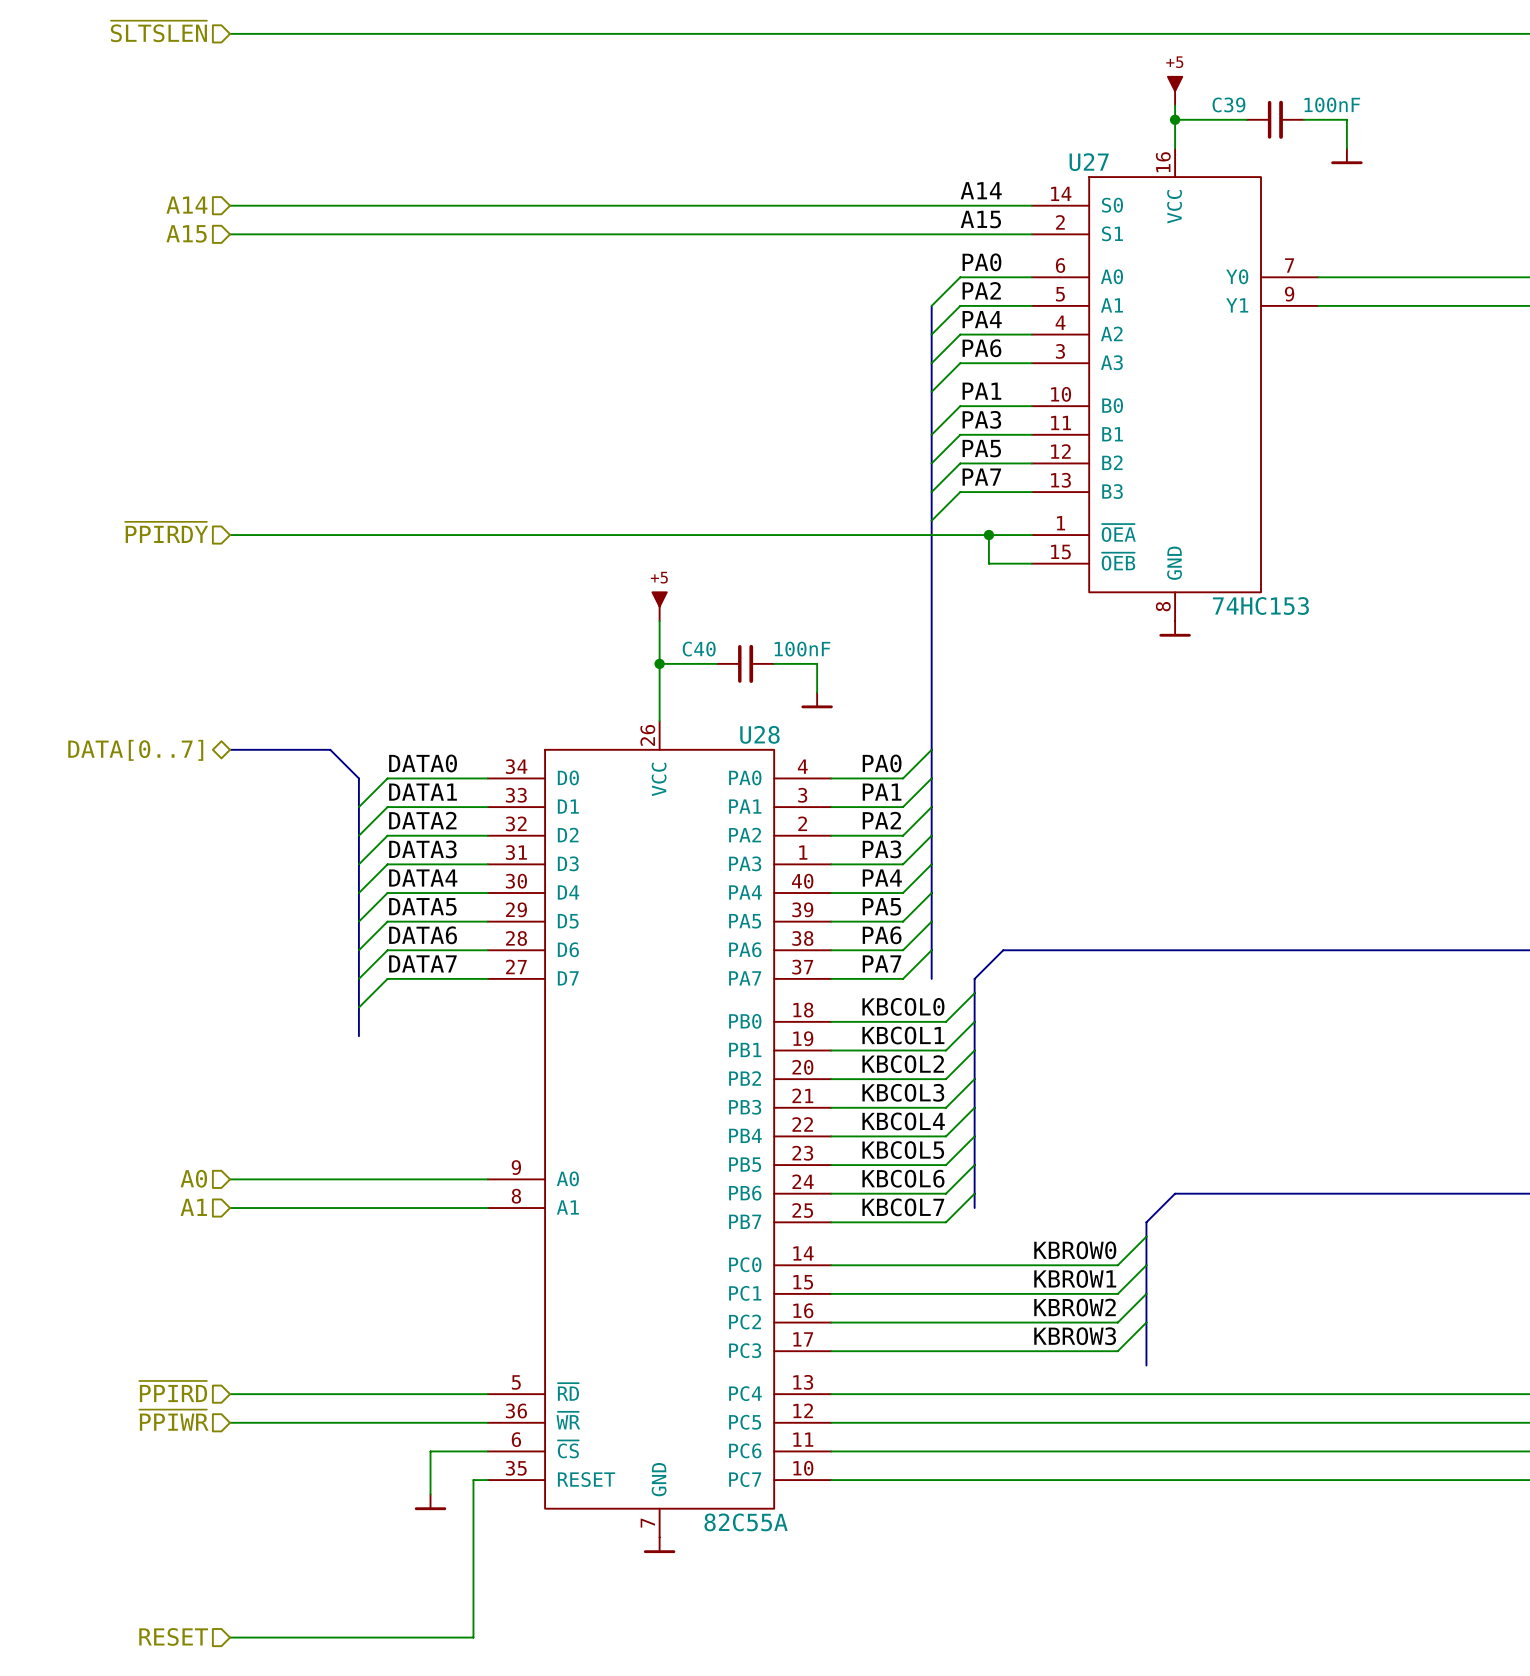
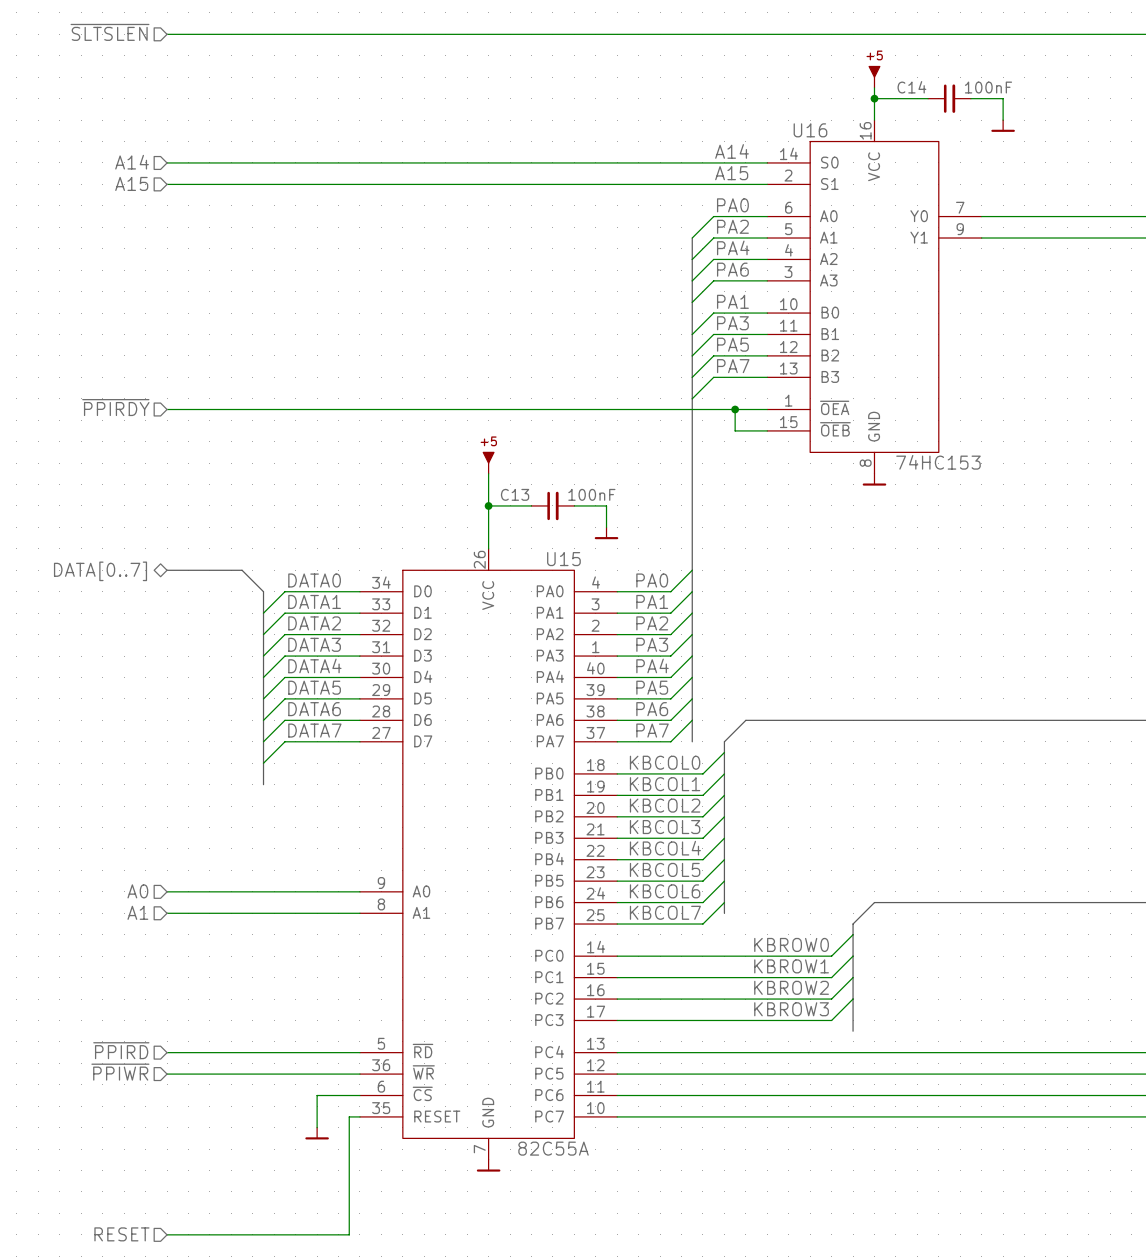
C39 name: C39 (1228, 104) -> C14 (911, 87)
U27 name: U27 (1089, 162) -> U16 (810, 130)
C40 name: C40 (699, 649) -> C13 (515, 494)
U28 name: U28 (759, 734) -> U15 (563, 559)

